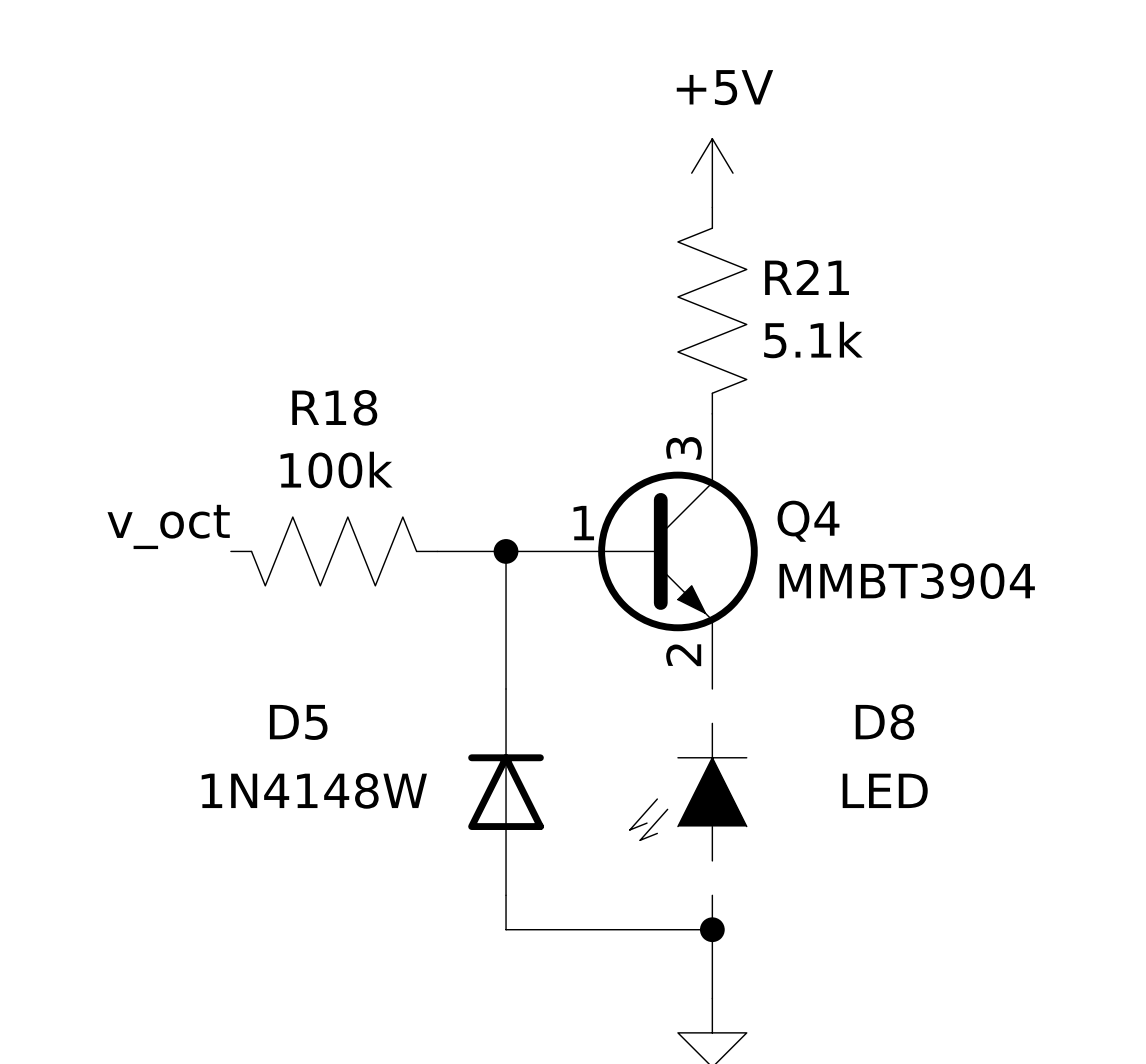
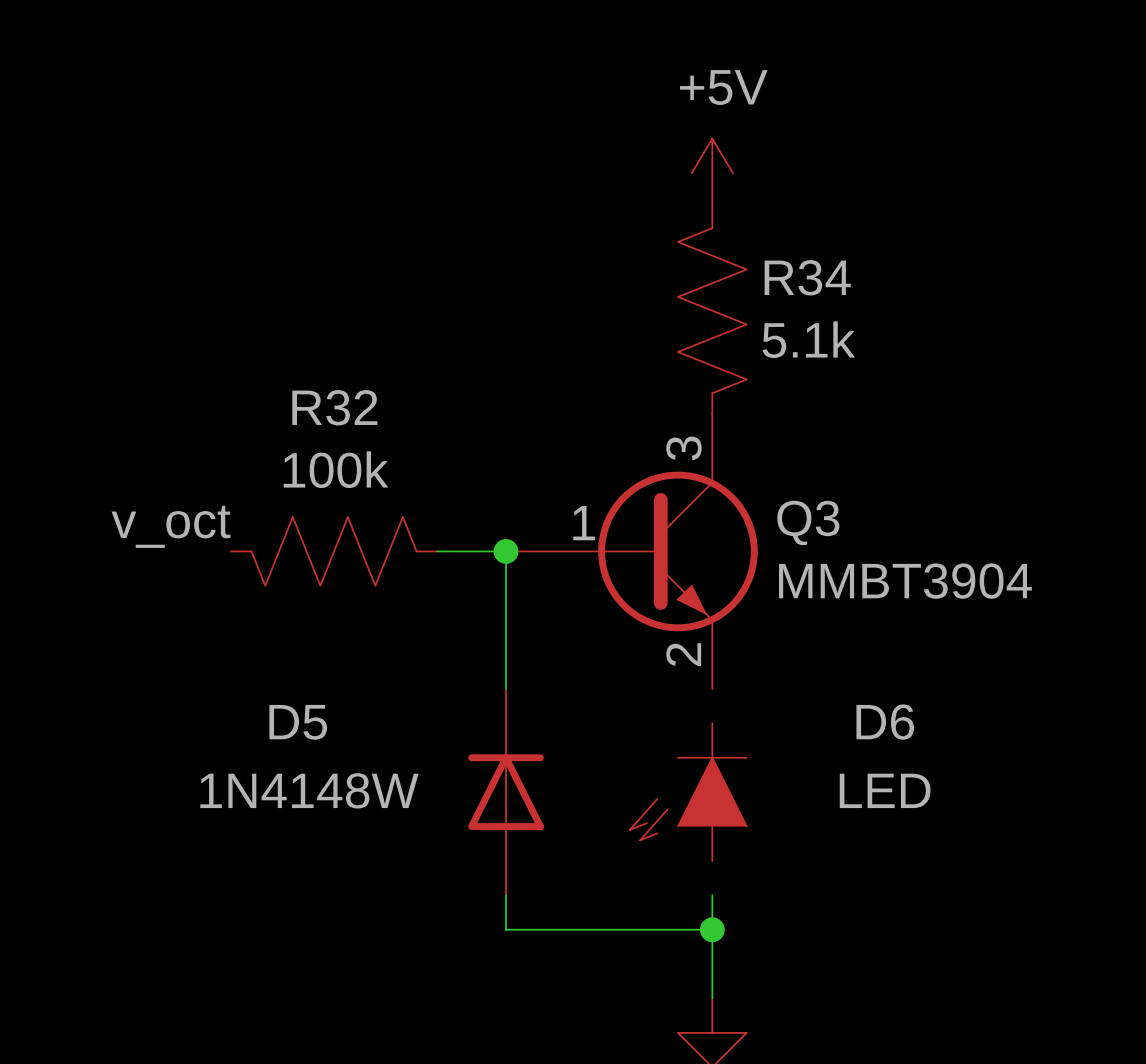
R21 name: R21 (807, 277) -> R34 (807, 277)
R18 name: R18 (334, 407) -> R32 (334, 407)
Q4 name: Q4 (808, 521) -> Q3 (808, 522)
D8 name: D8 (884, 722) -> D6 (885, 722)

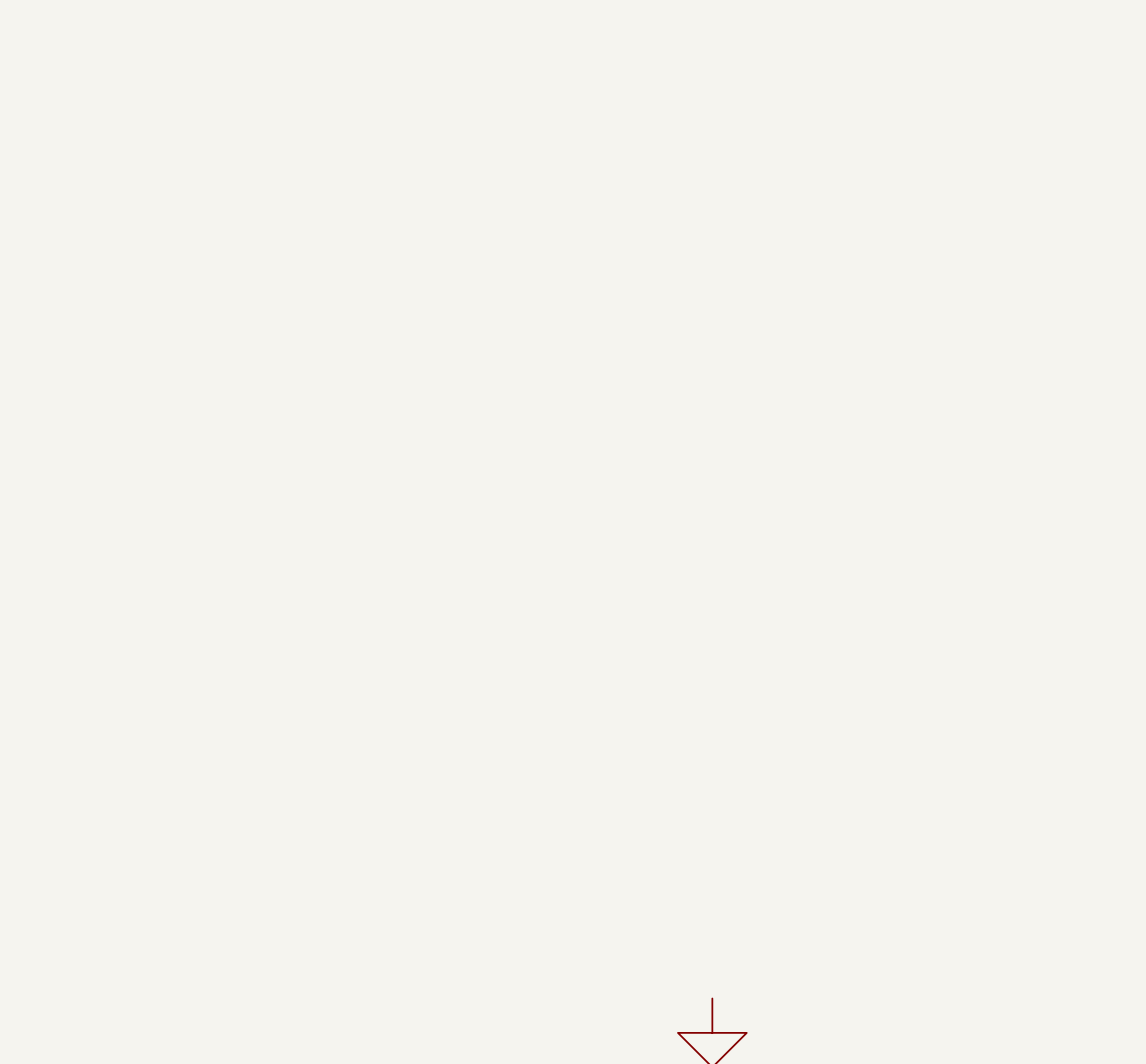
power symbol: +5V (712, 173) -> none
R34: 5.1k (712, 310) -> none
label: v_oct (171, 526) -> none
R32: 100k (334, 551) -> none
wire: (437, 551) (506, 551) (506, 688) -> none
junction: (506, 551) -> none
Q3: MMBT3904 (631, 551) -> none
D5: 1N4148W (506, 792) -> none
D6: LED (688, 792) -> none
wire: (506, 895) (506, 929) (712, 929) -> none
wire: (712, 895) (712, 998) -> none
junction: (712, 929) -> none

